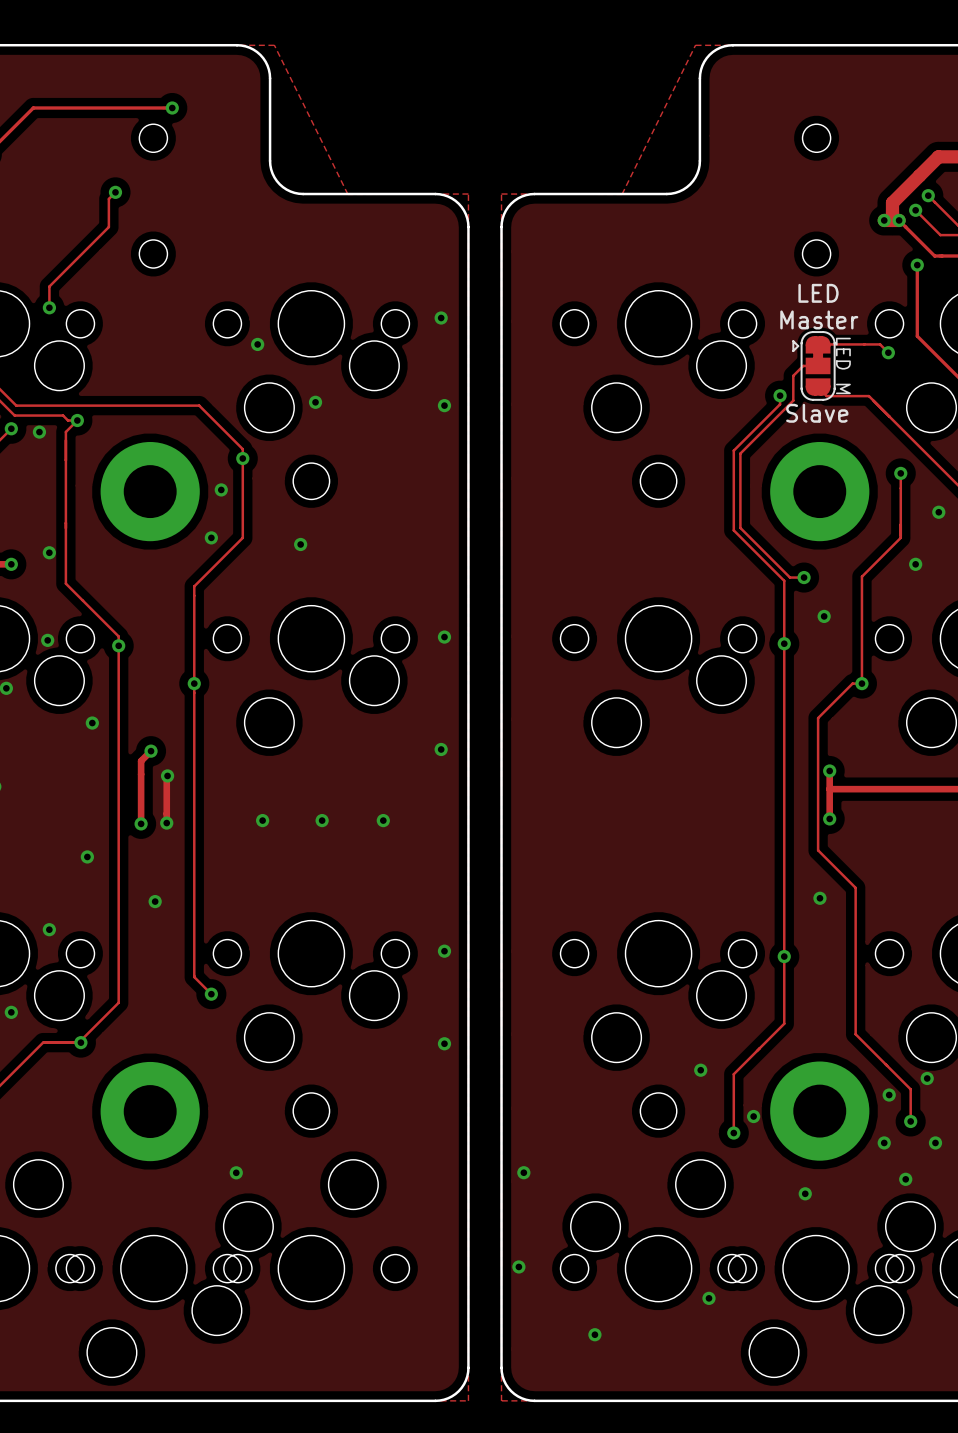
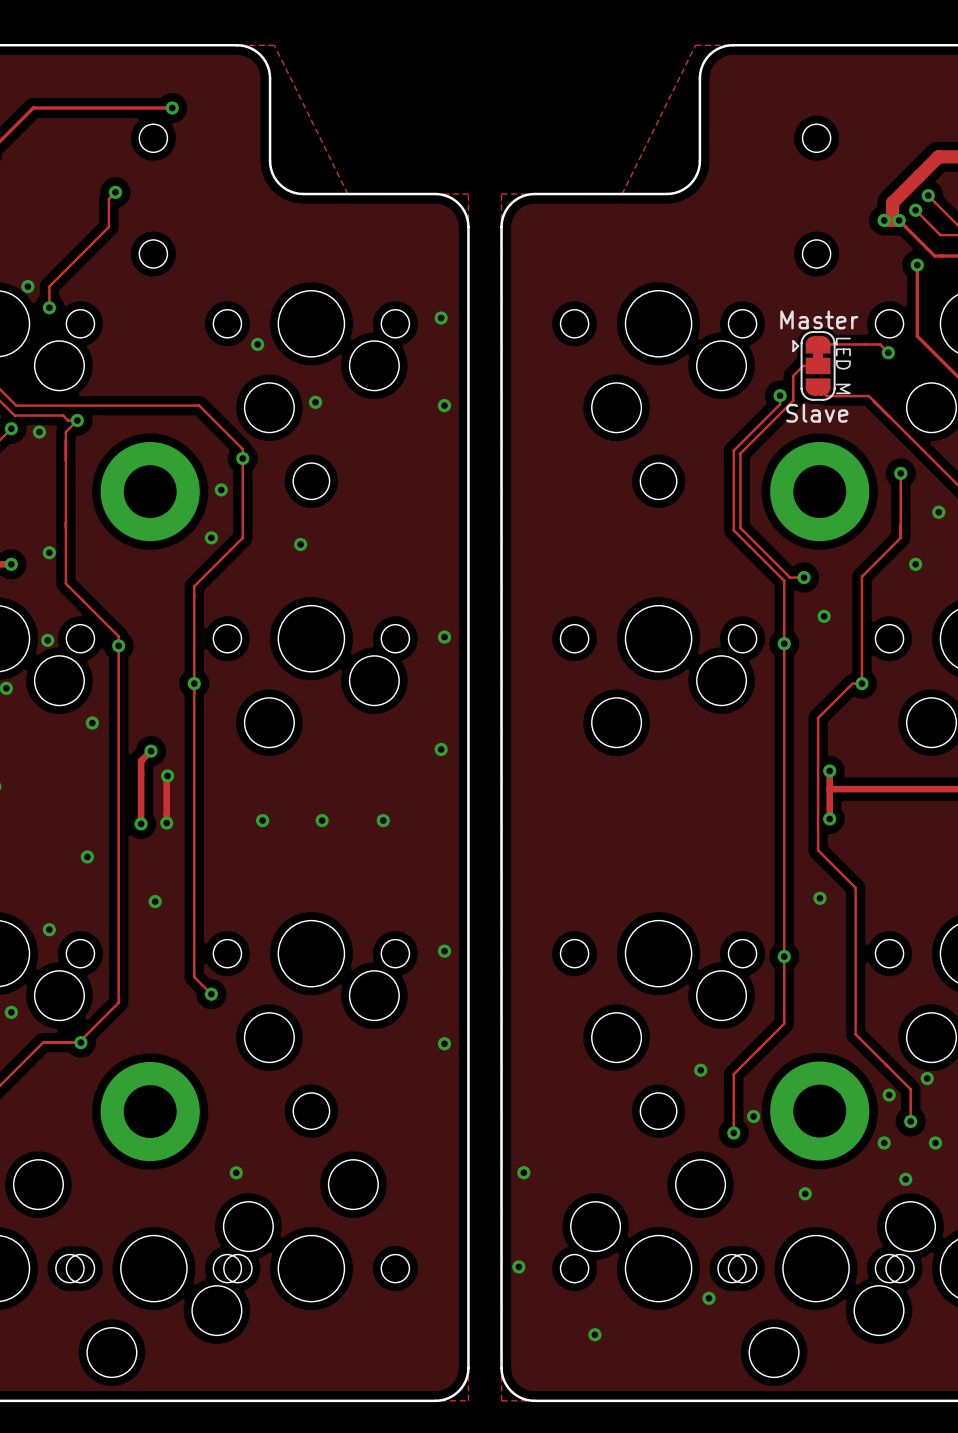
via: none -> (27, 286)
text: LED (818, 293) -> none

